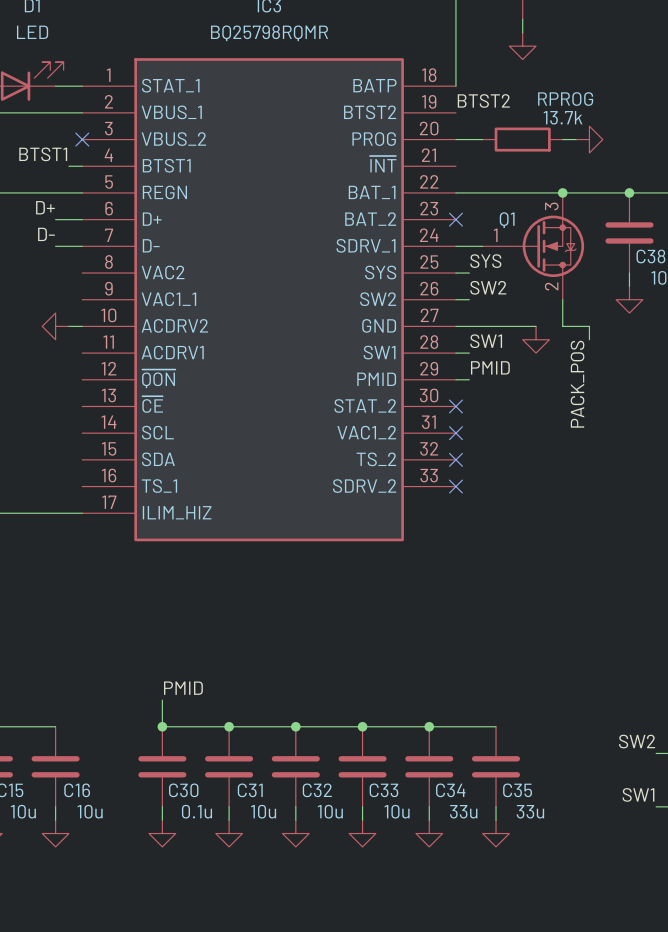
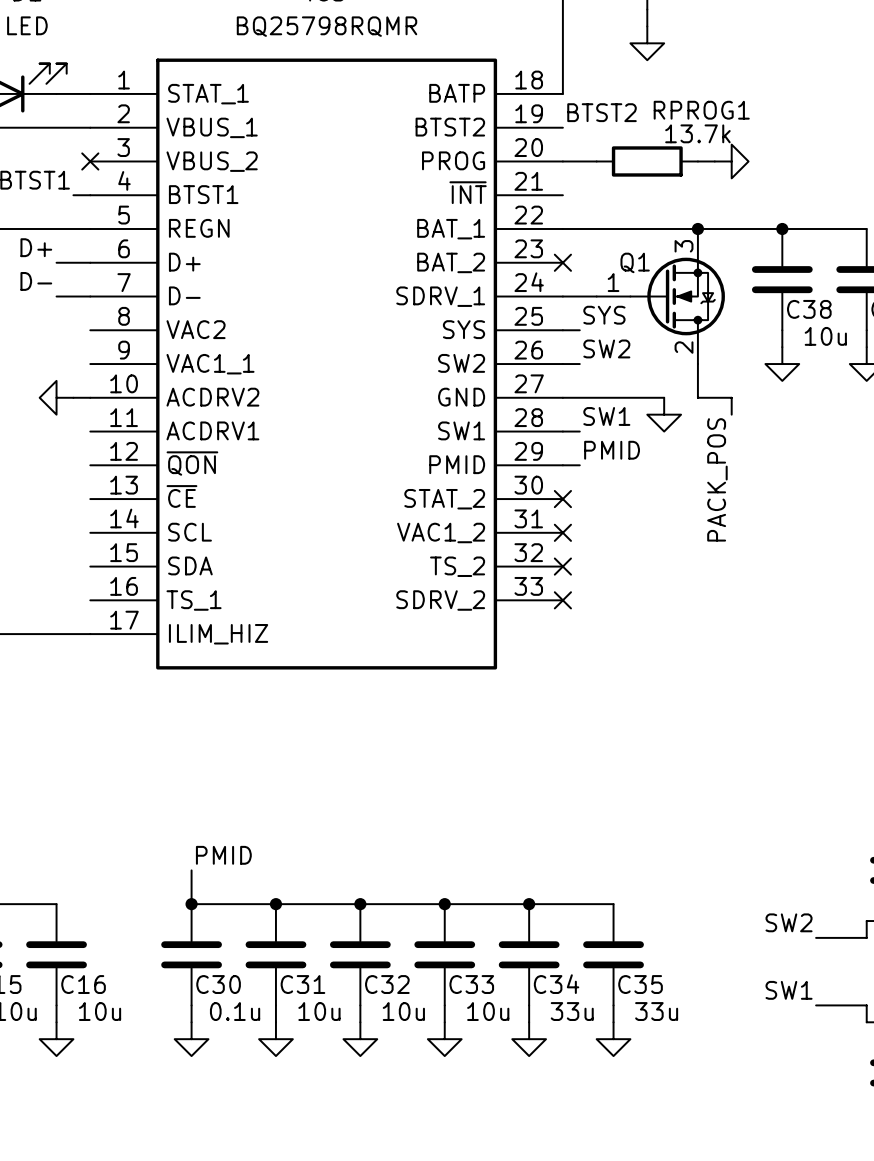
RPROG name: RPROG (565, 99) -> RPROG1 (701, 110)

